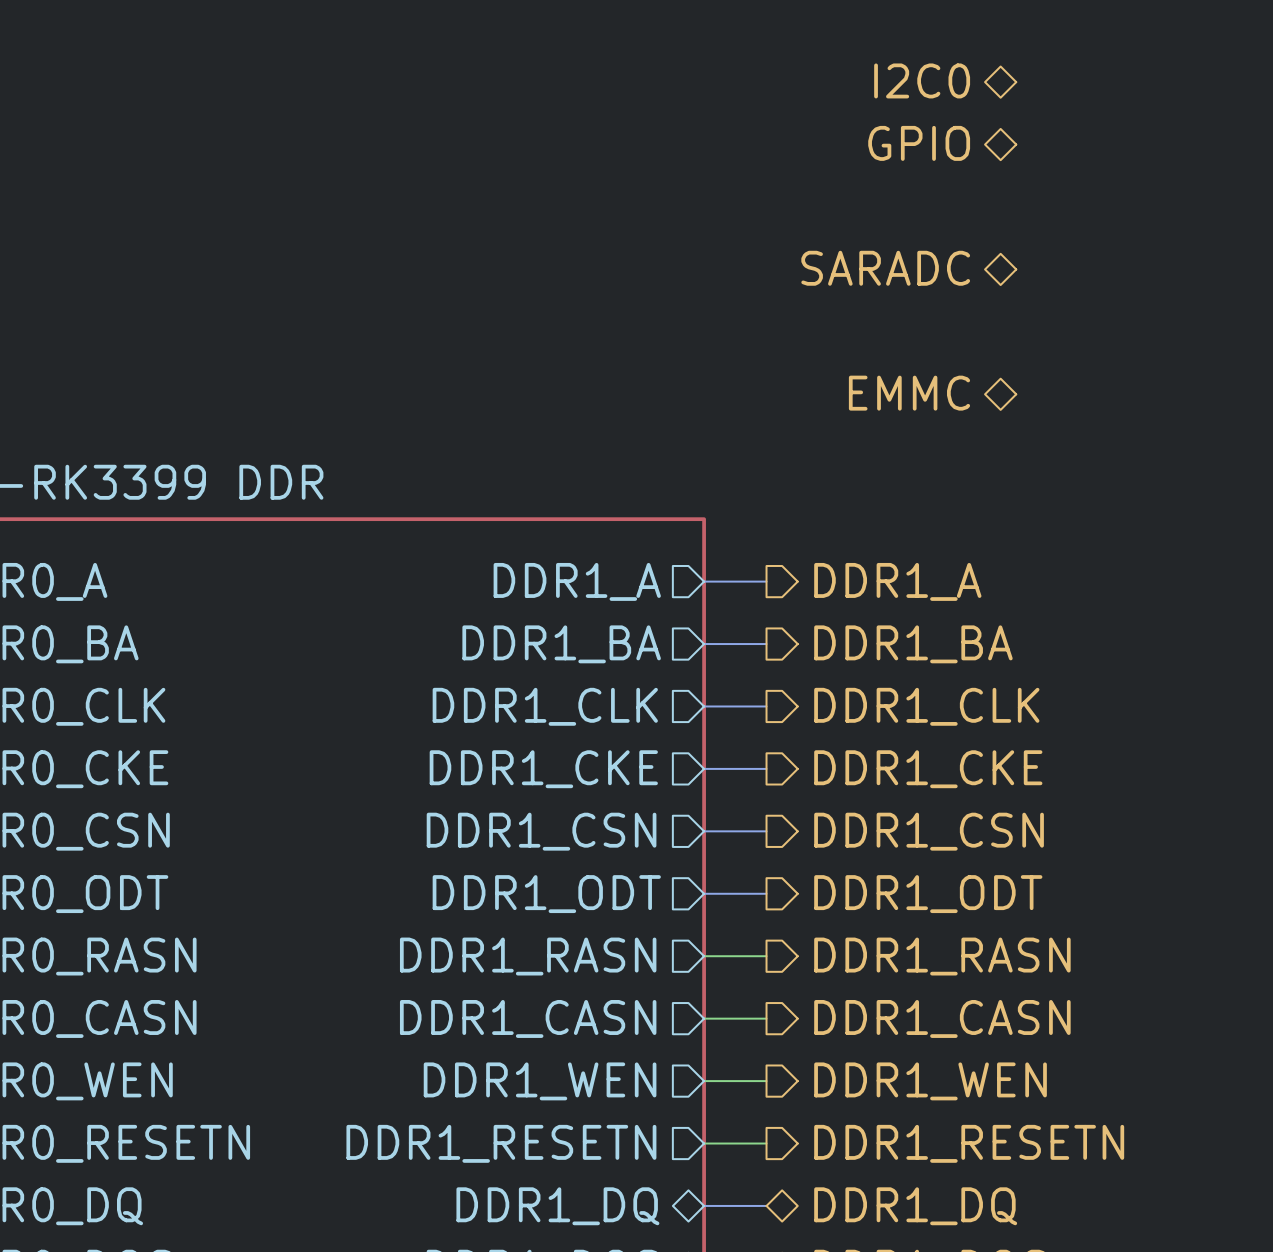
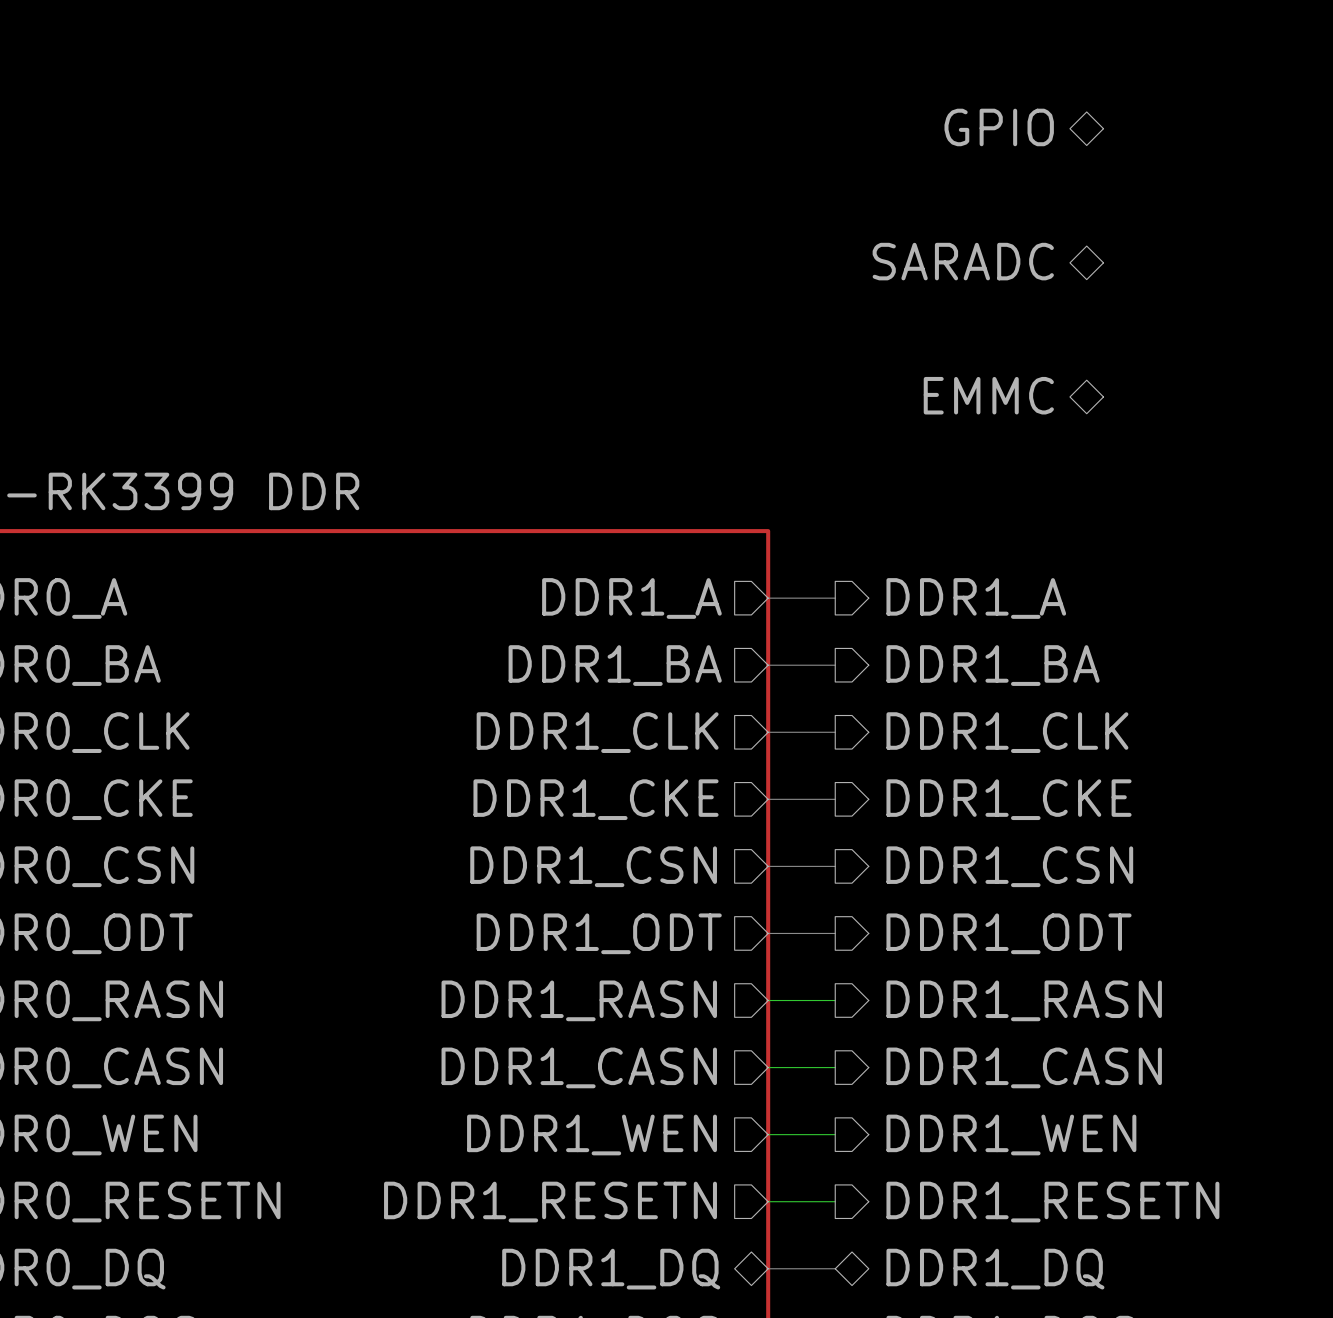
hierarchical label: I2C0 (922, 80) -> none

